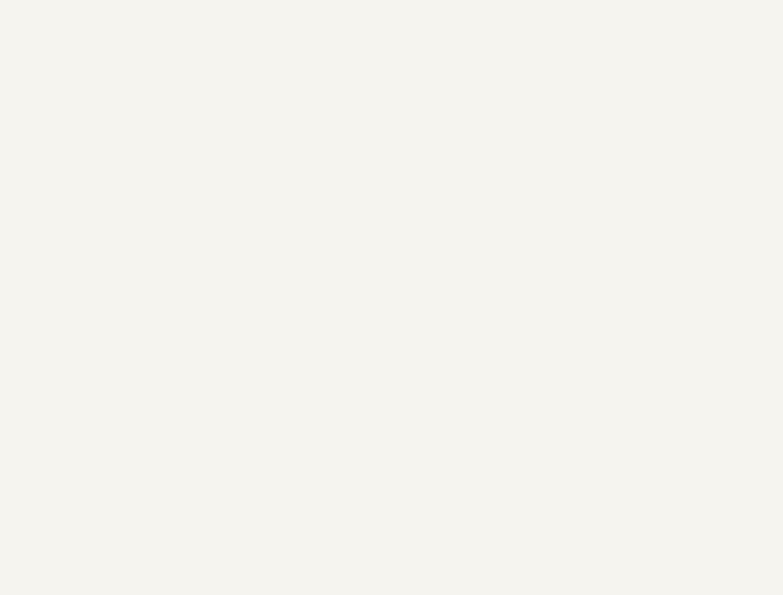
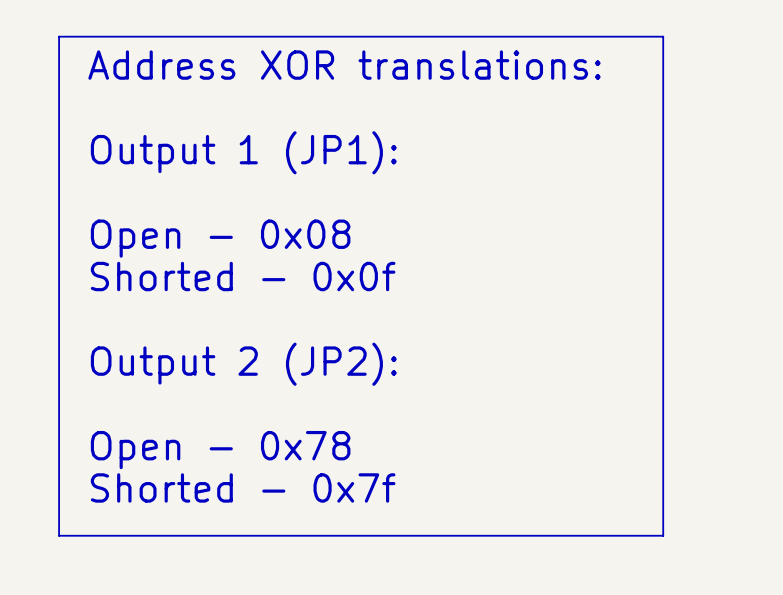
line: none -> (59, 36) (663, 36) (663, 535) (59, 535) (59, 36)
text: none -> Address XOR translations: (344, 65)
text: none -> Output 1 (JP1): (243, 152)
text: none -> Open - 0x08 (220, 238)
text: none -> Shorted - 0x0f (243, 276)
text: none -> Output 2 (JP2): (243, 364)
text: none -> Open - 0x78 (220, 450)
text: none -> Shorted - 0x7f (243, 487)

